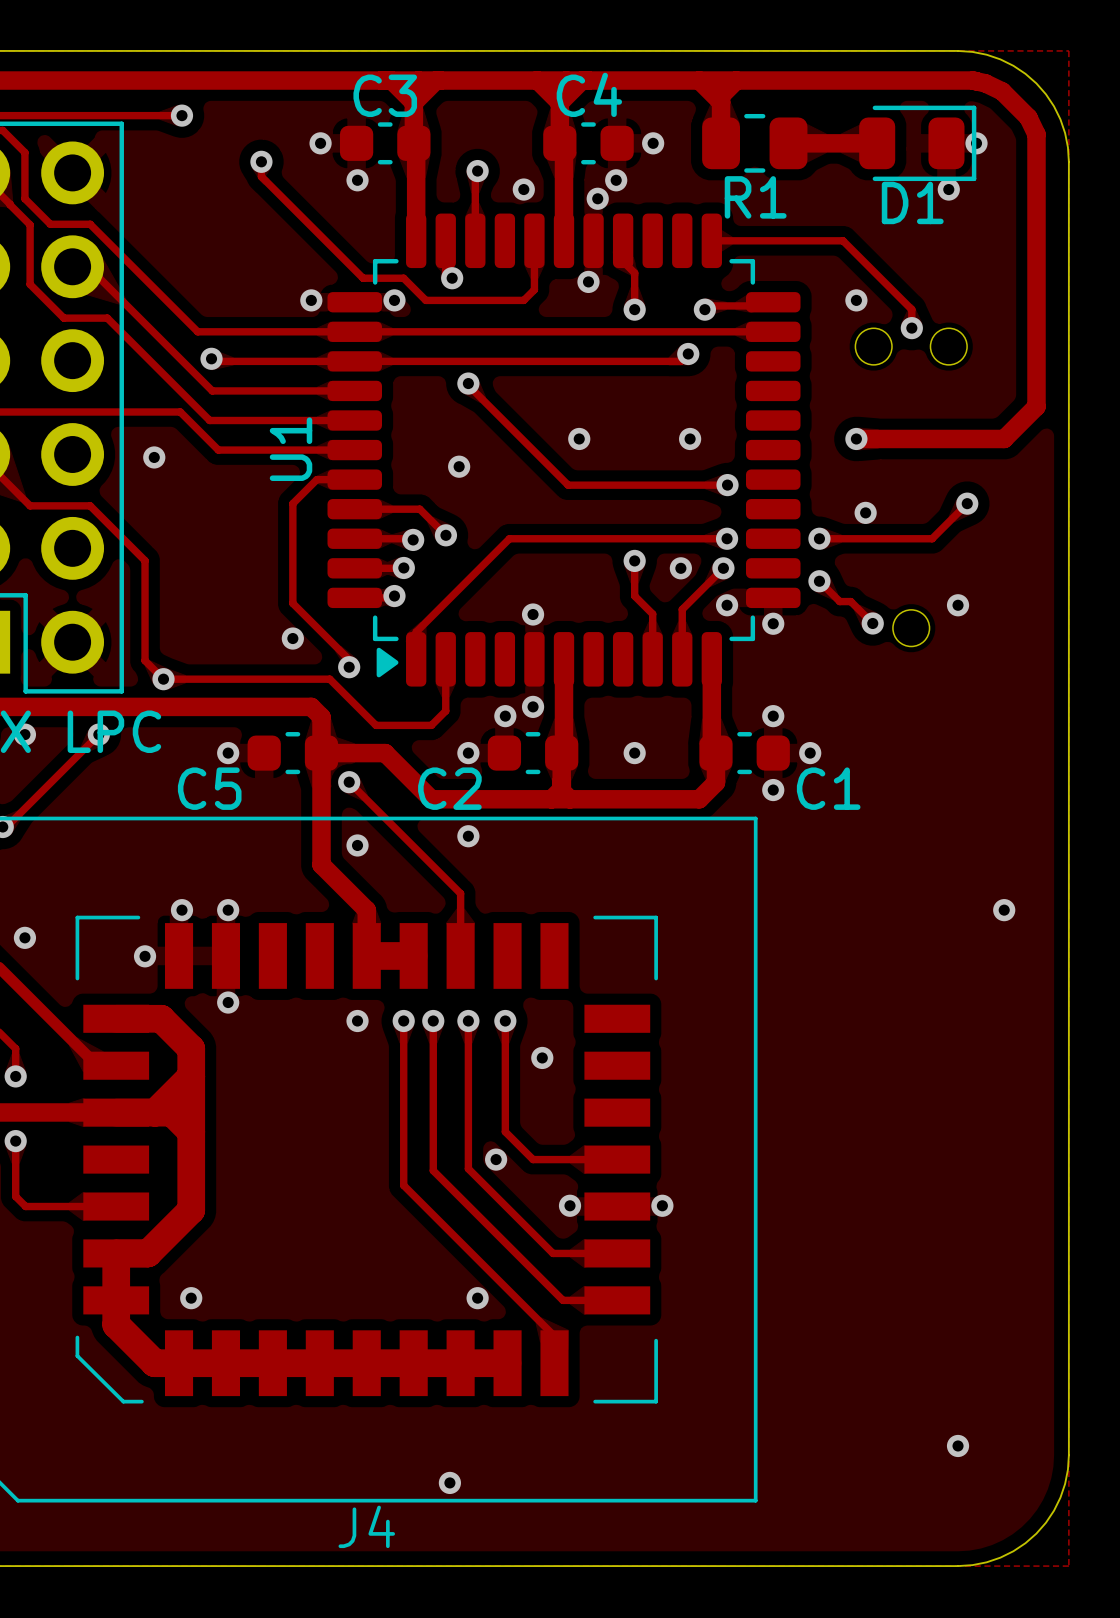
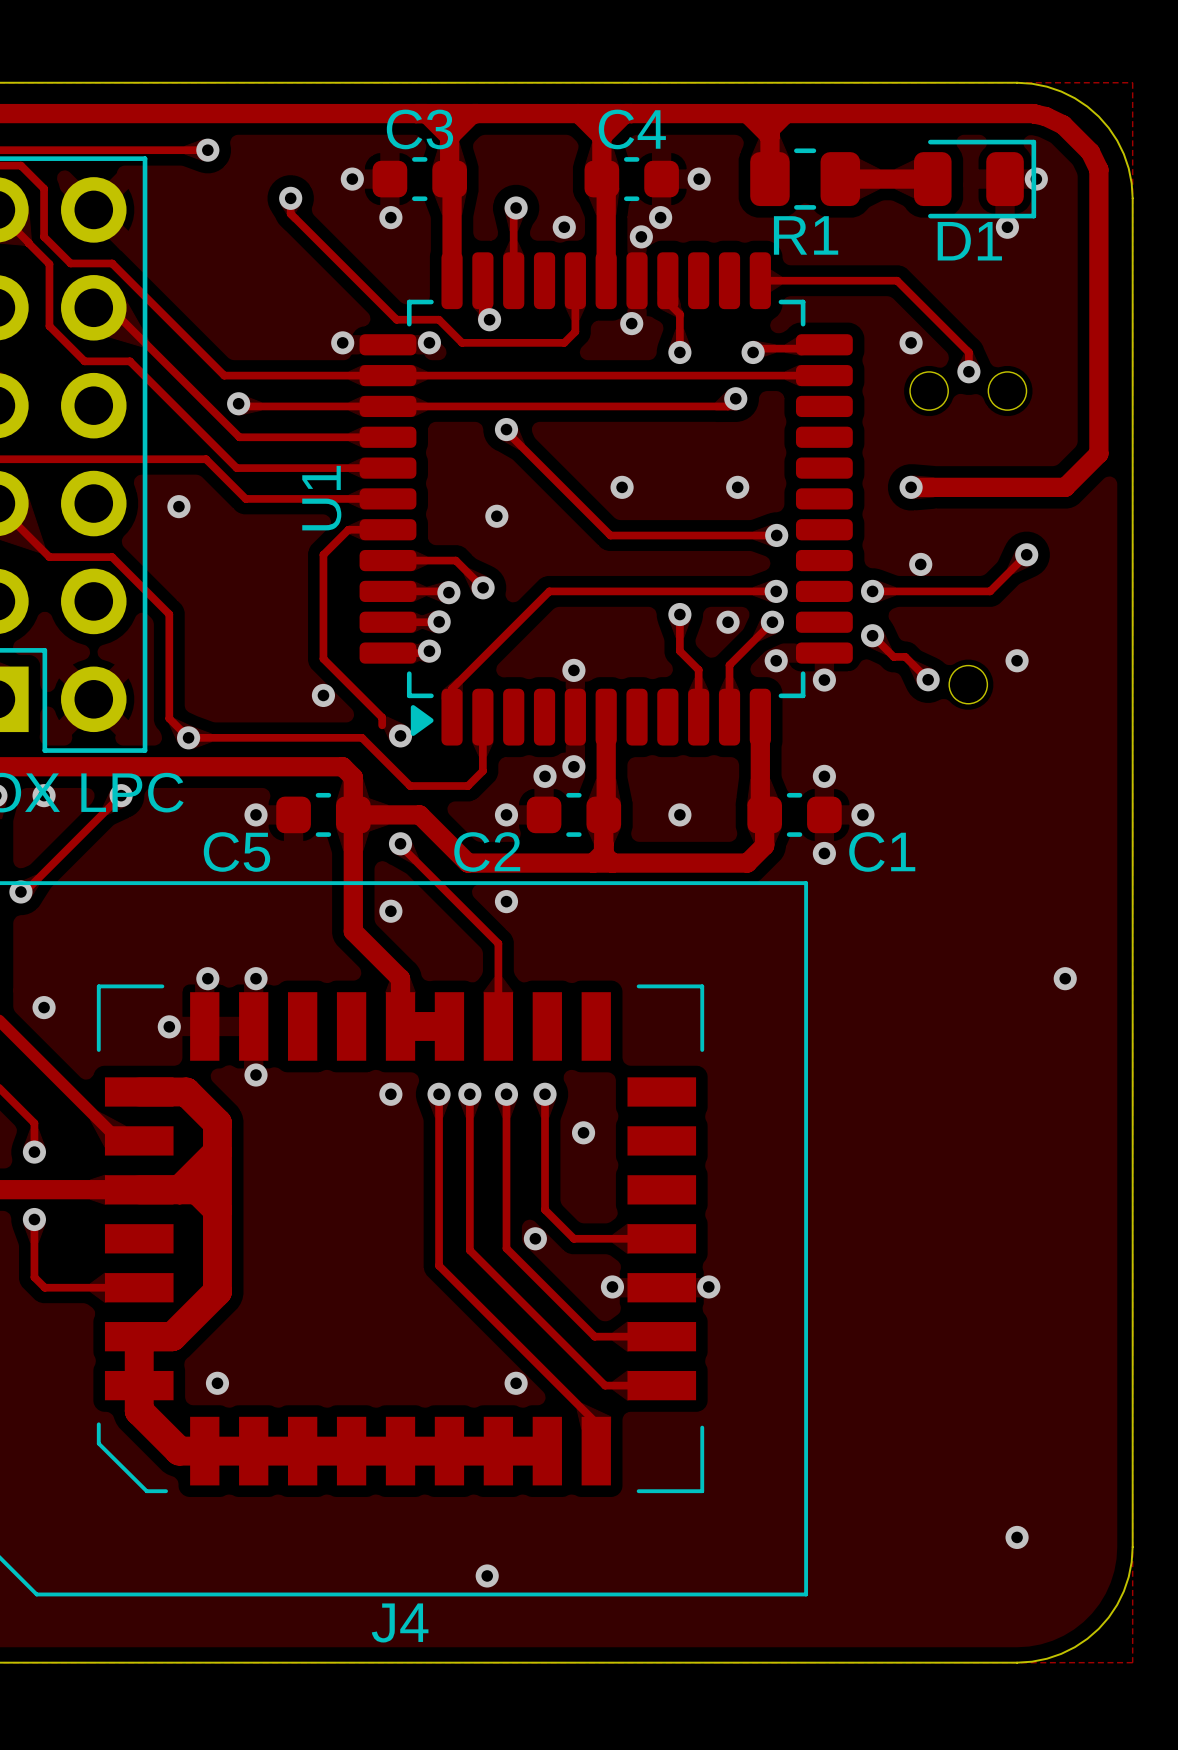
via position: (349, 667) -> (400, 735)
track: (349, 782) (460, 893) -> (400, 843) (498, 943) (498, 961)
via position: (349, 782) -> (400, 843)

